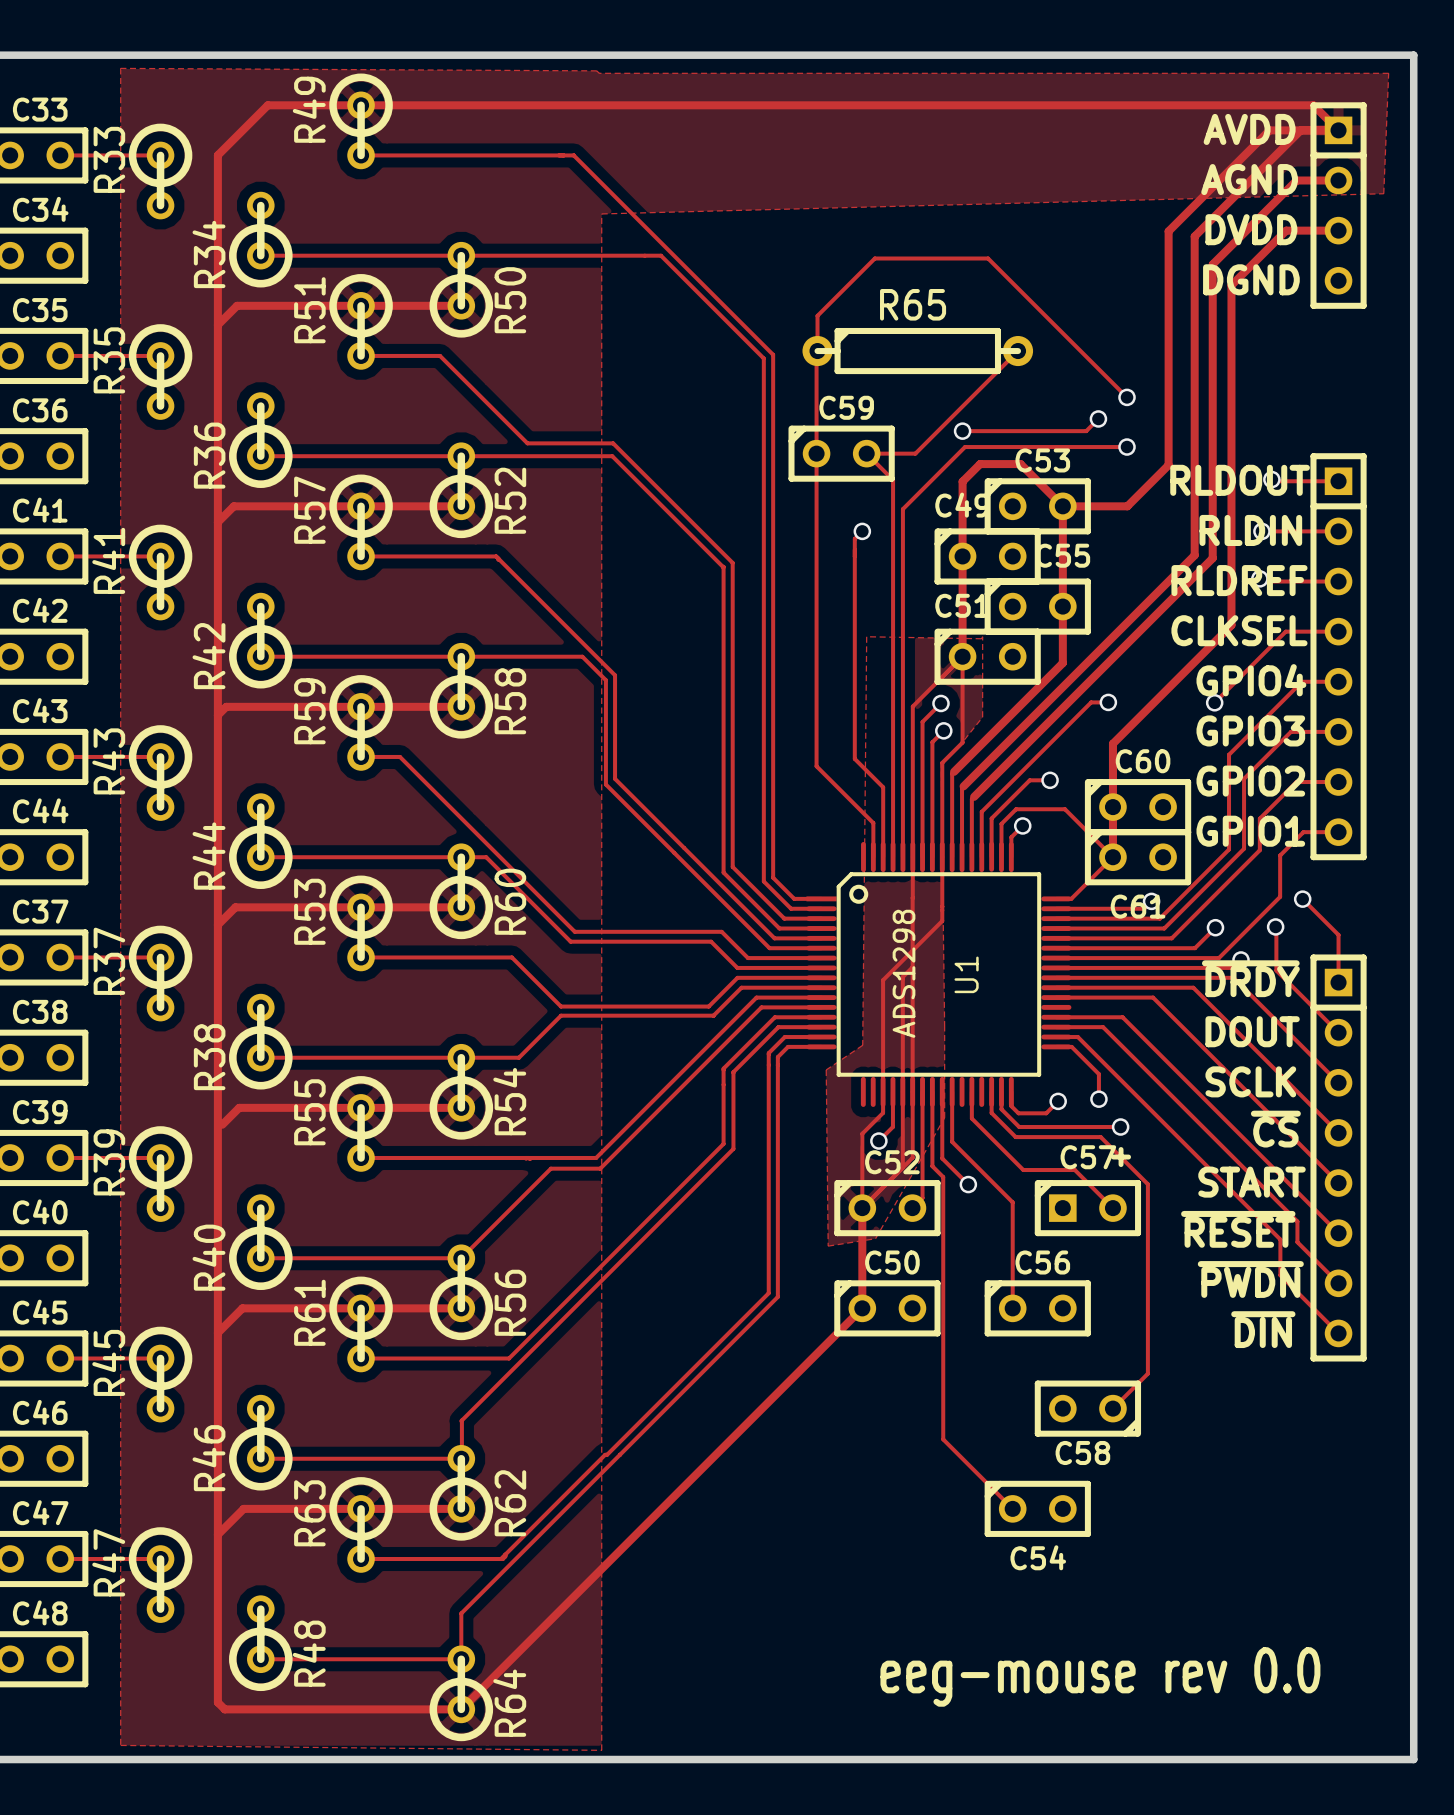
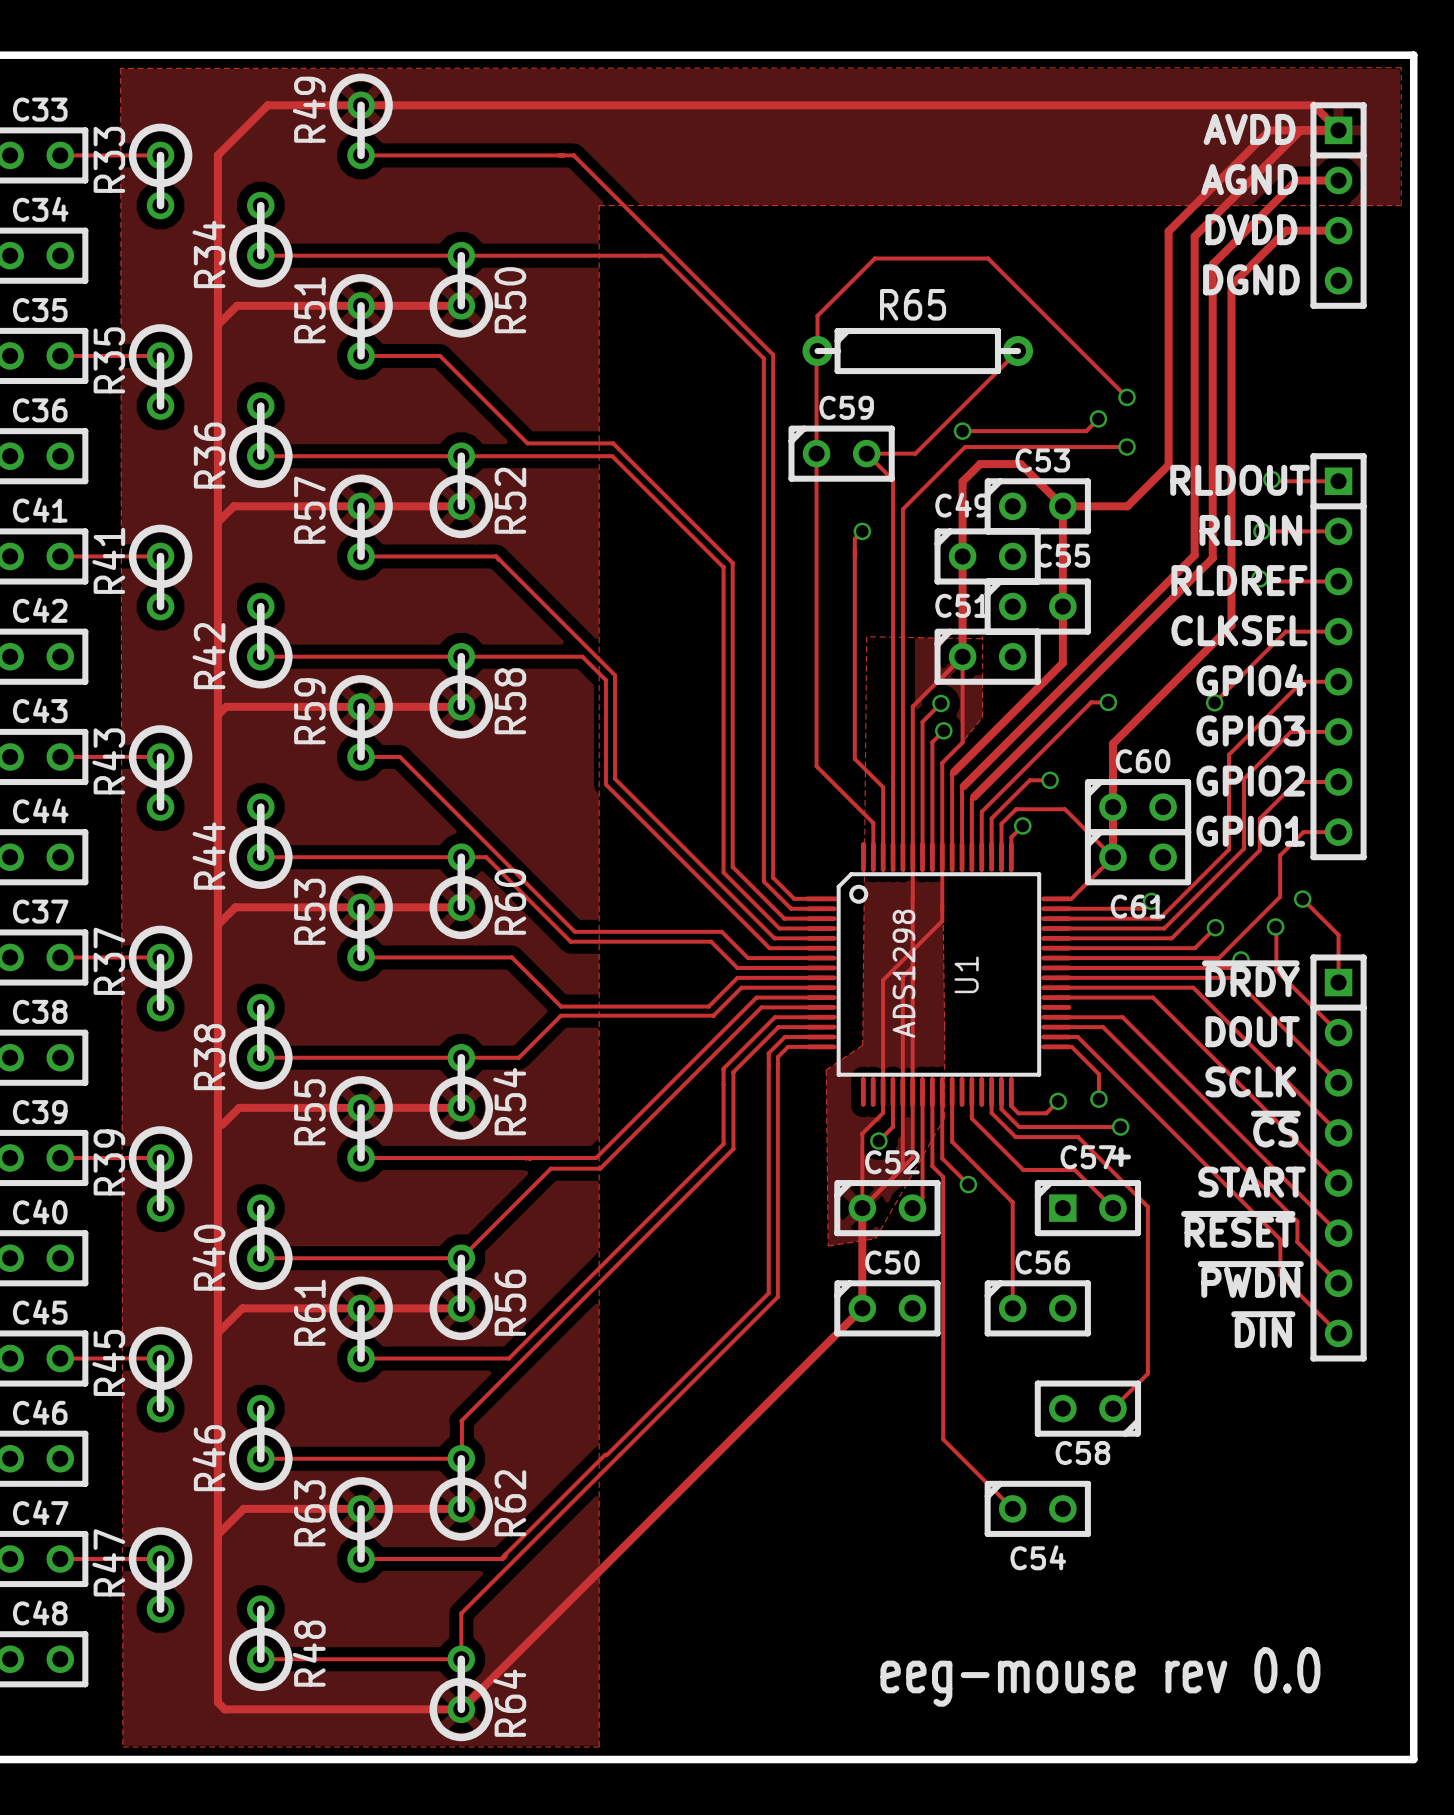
zone outline: (120, 68) (596, 70) (599, 73) (1388, 73) (1383, 193) (601, 213) (601, 1750) (120, 1745) (120, 68) -> (1401, 67) (120, 68) (122, 1746) (599, 1746) (599, 205) (1401, 205) (1401, 67)
track: (1078, 1137) (1100, 1137) (1147, 1184) (1147, 1206) -> (1078, 1137) (1147, 1206)

